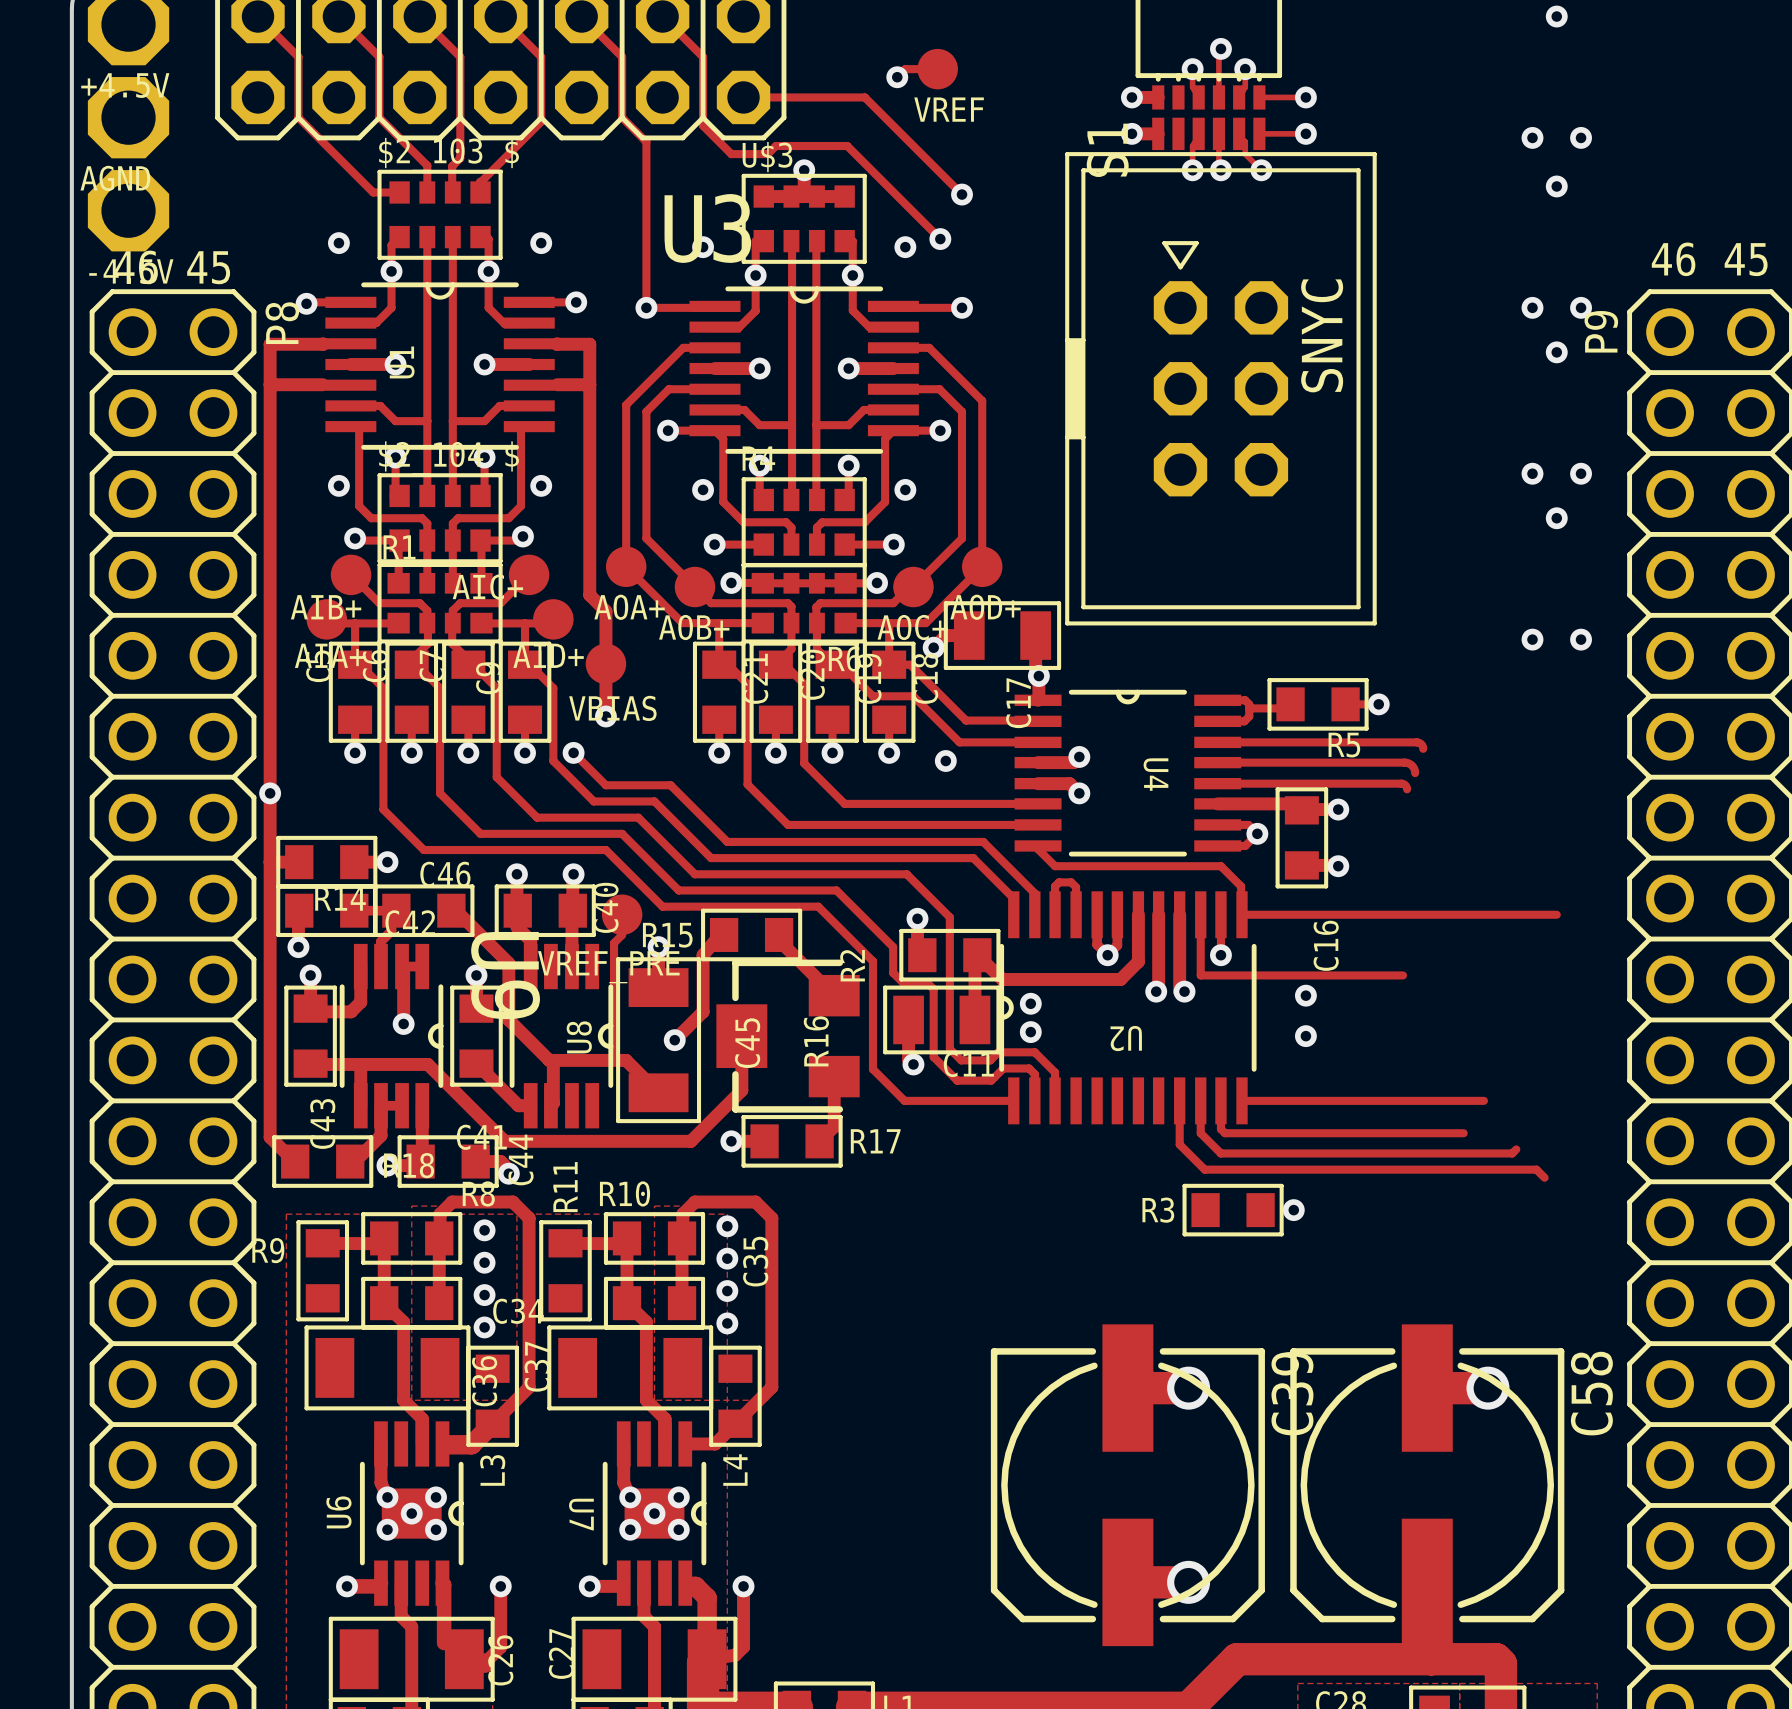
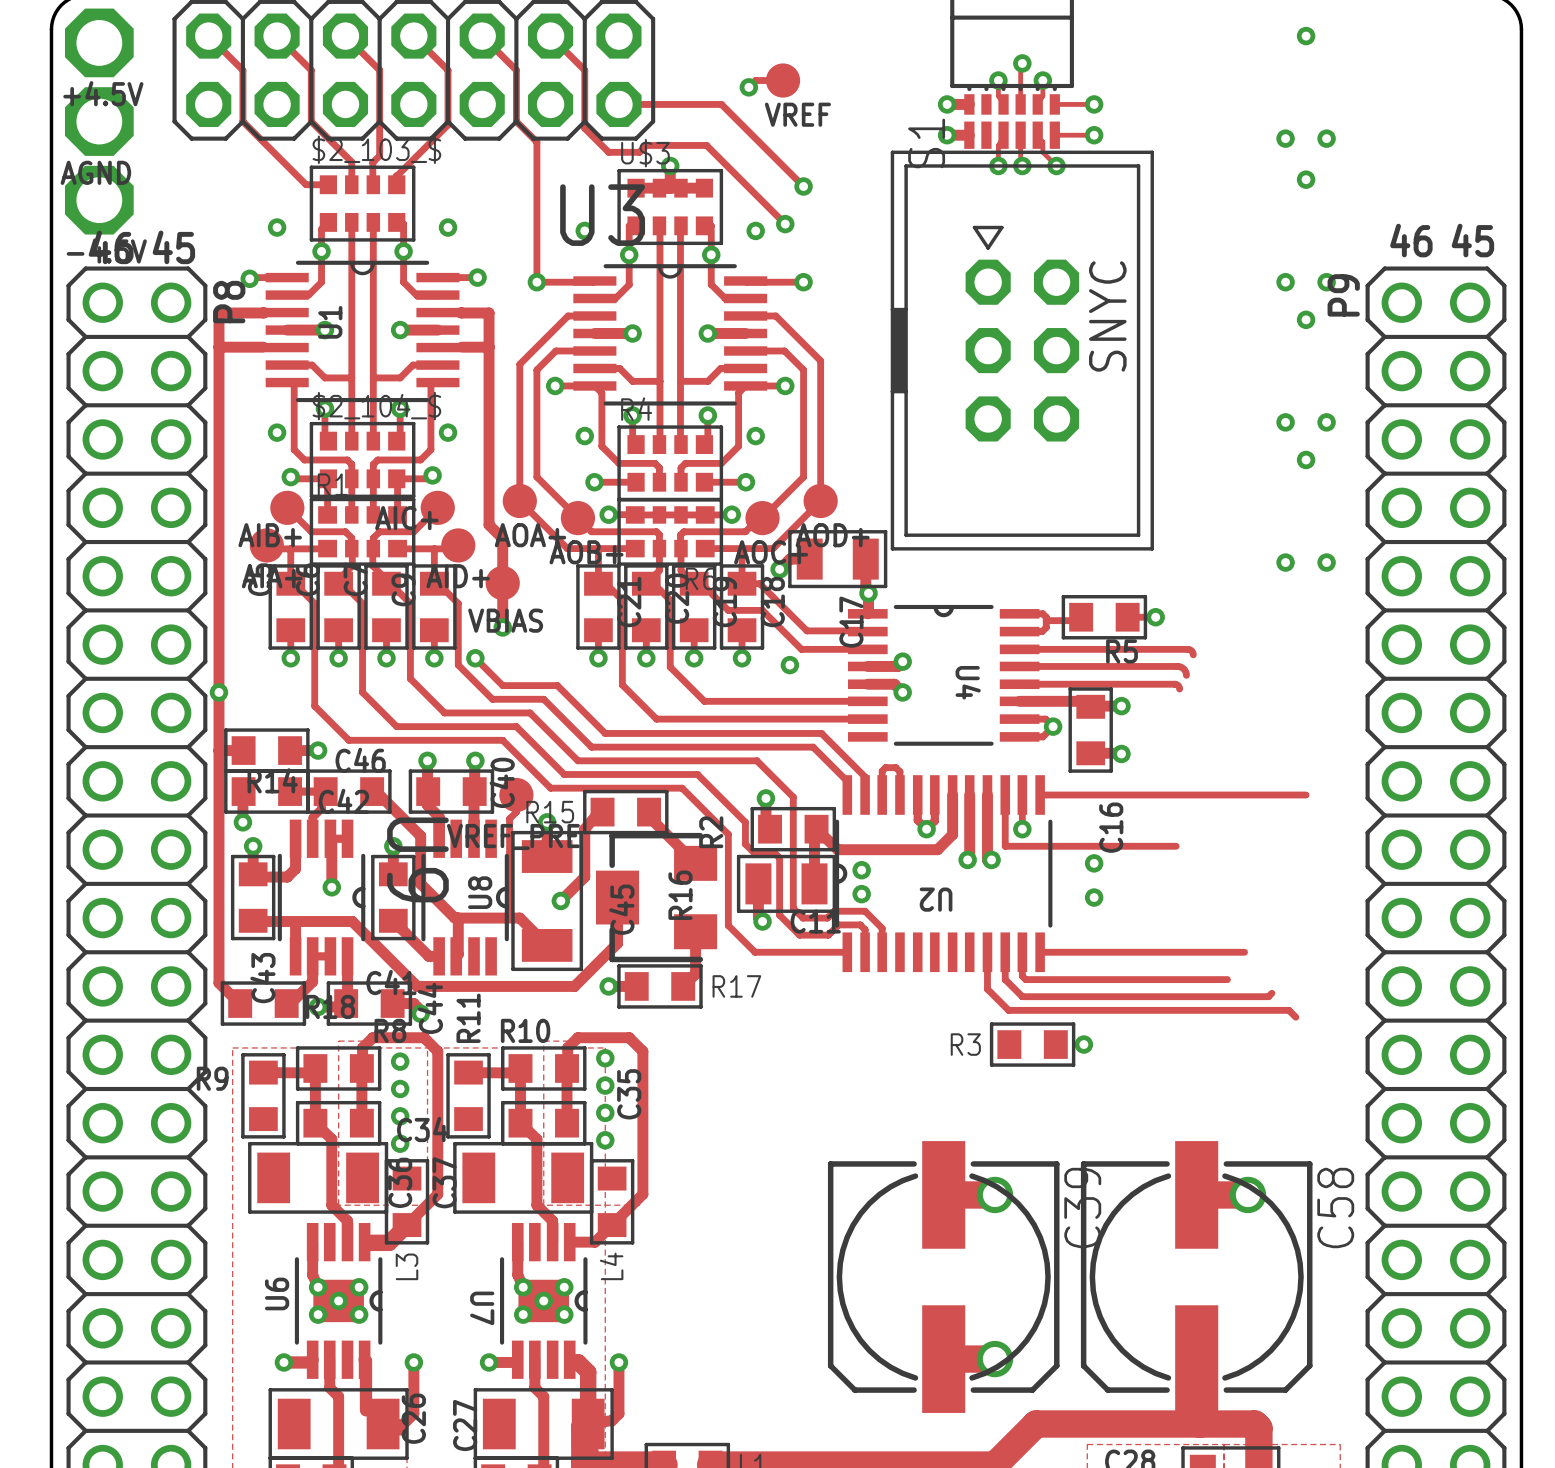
track: (1038, 845) (1038, 849) (1055, 866) (1220, 866) (1241, 886) (1241, 914) -> none

